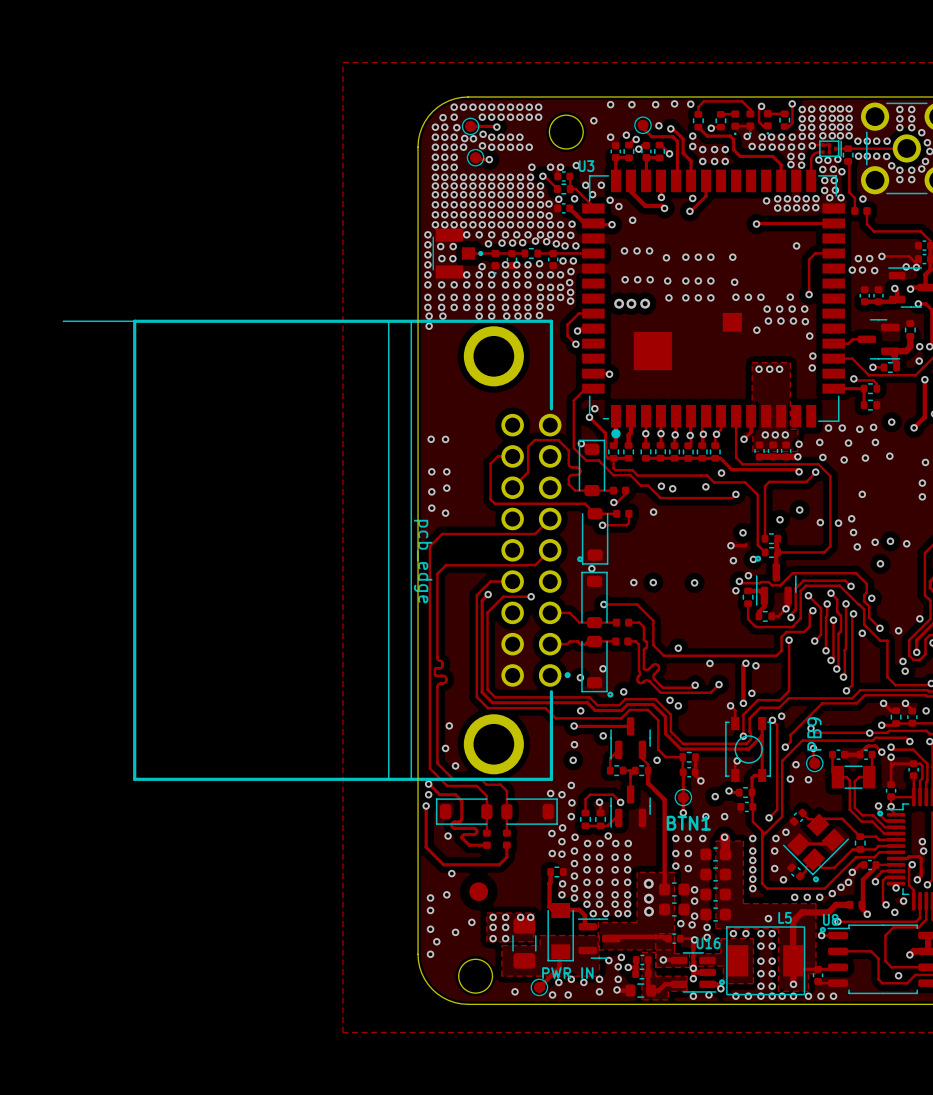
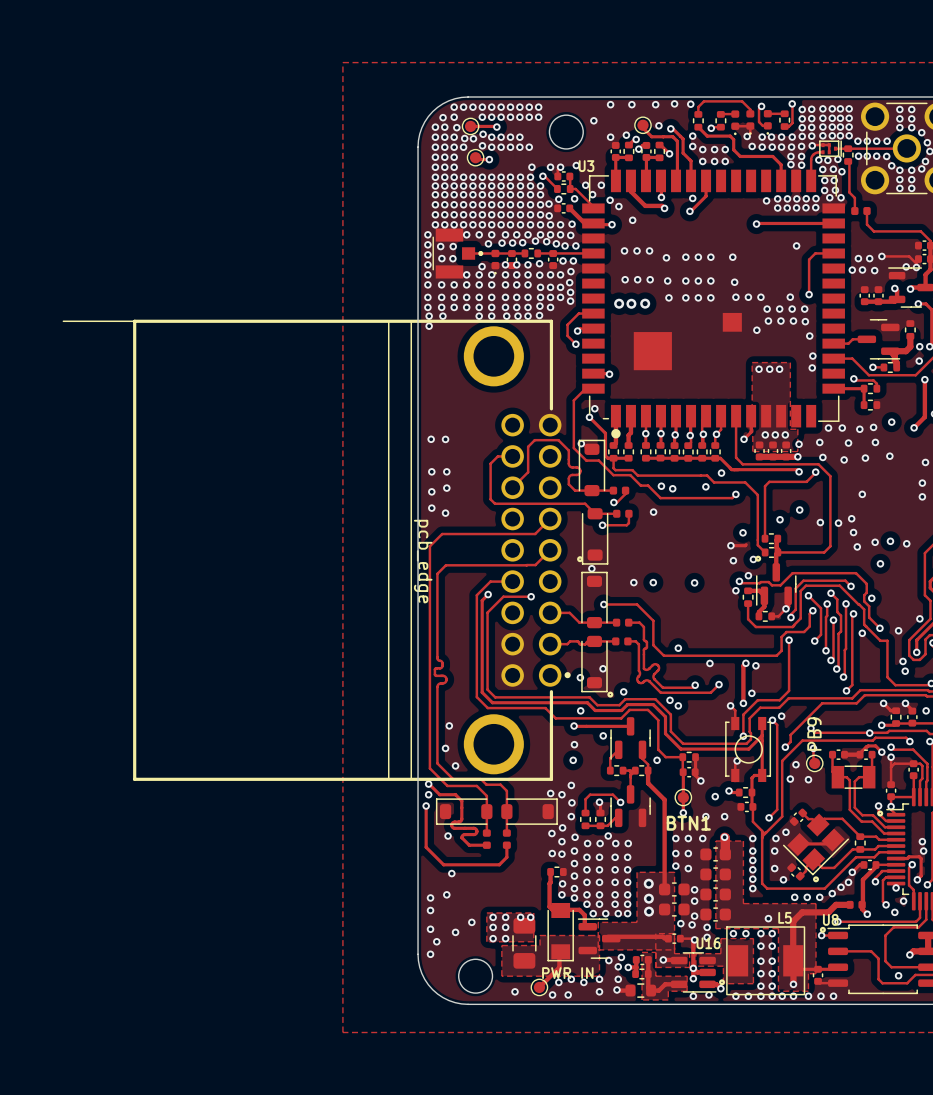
via: none -> (899, 188)
via: none -> (911, 188)
via: (862, 199) -> none
part: (478, 891) -> none

